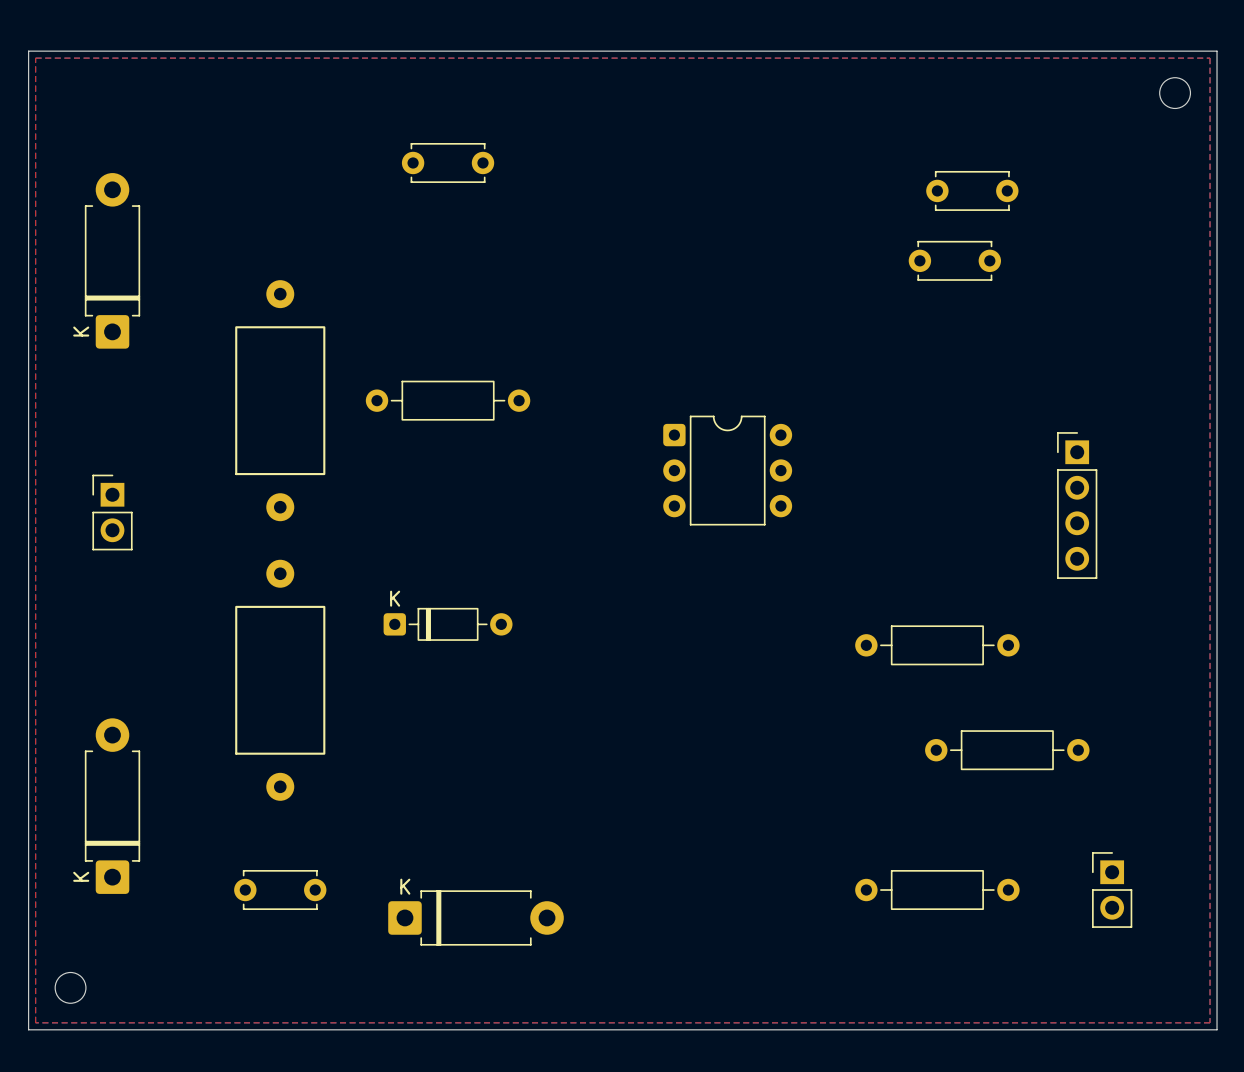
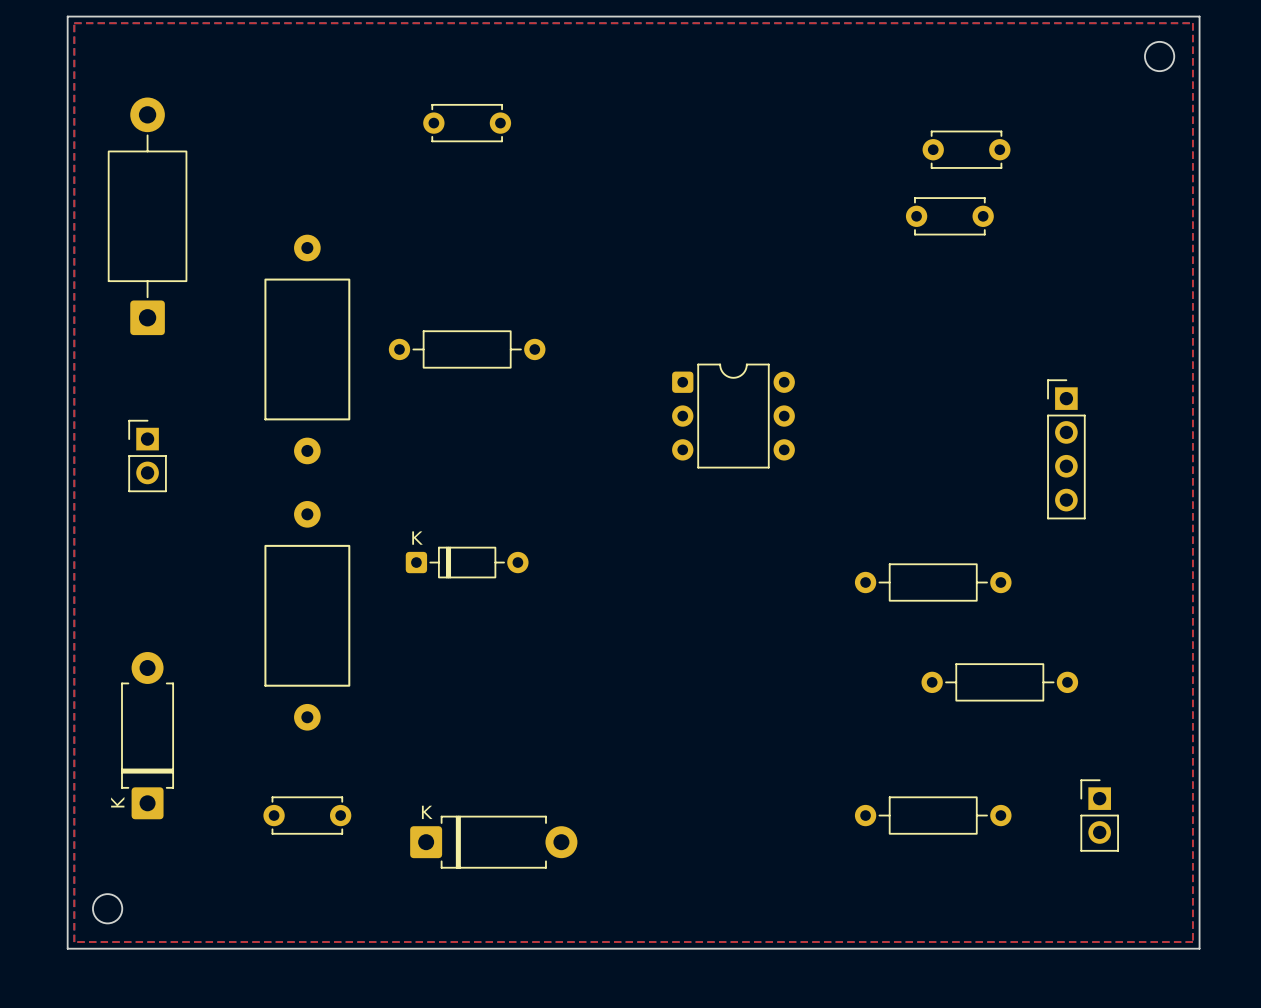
part footprint: [84, 173, 141, 349] -> [107, 97, 188, 336]

